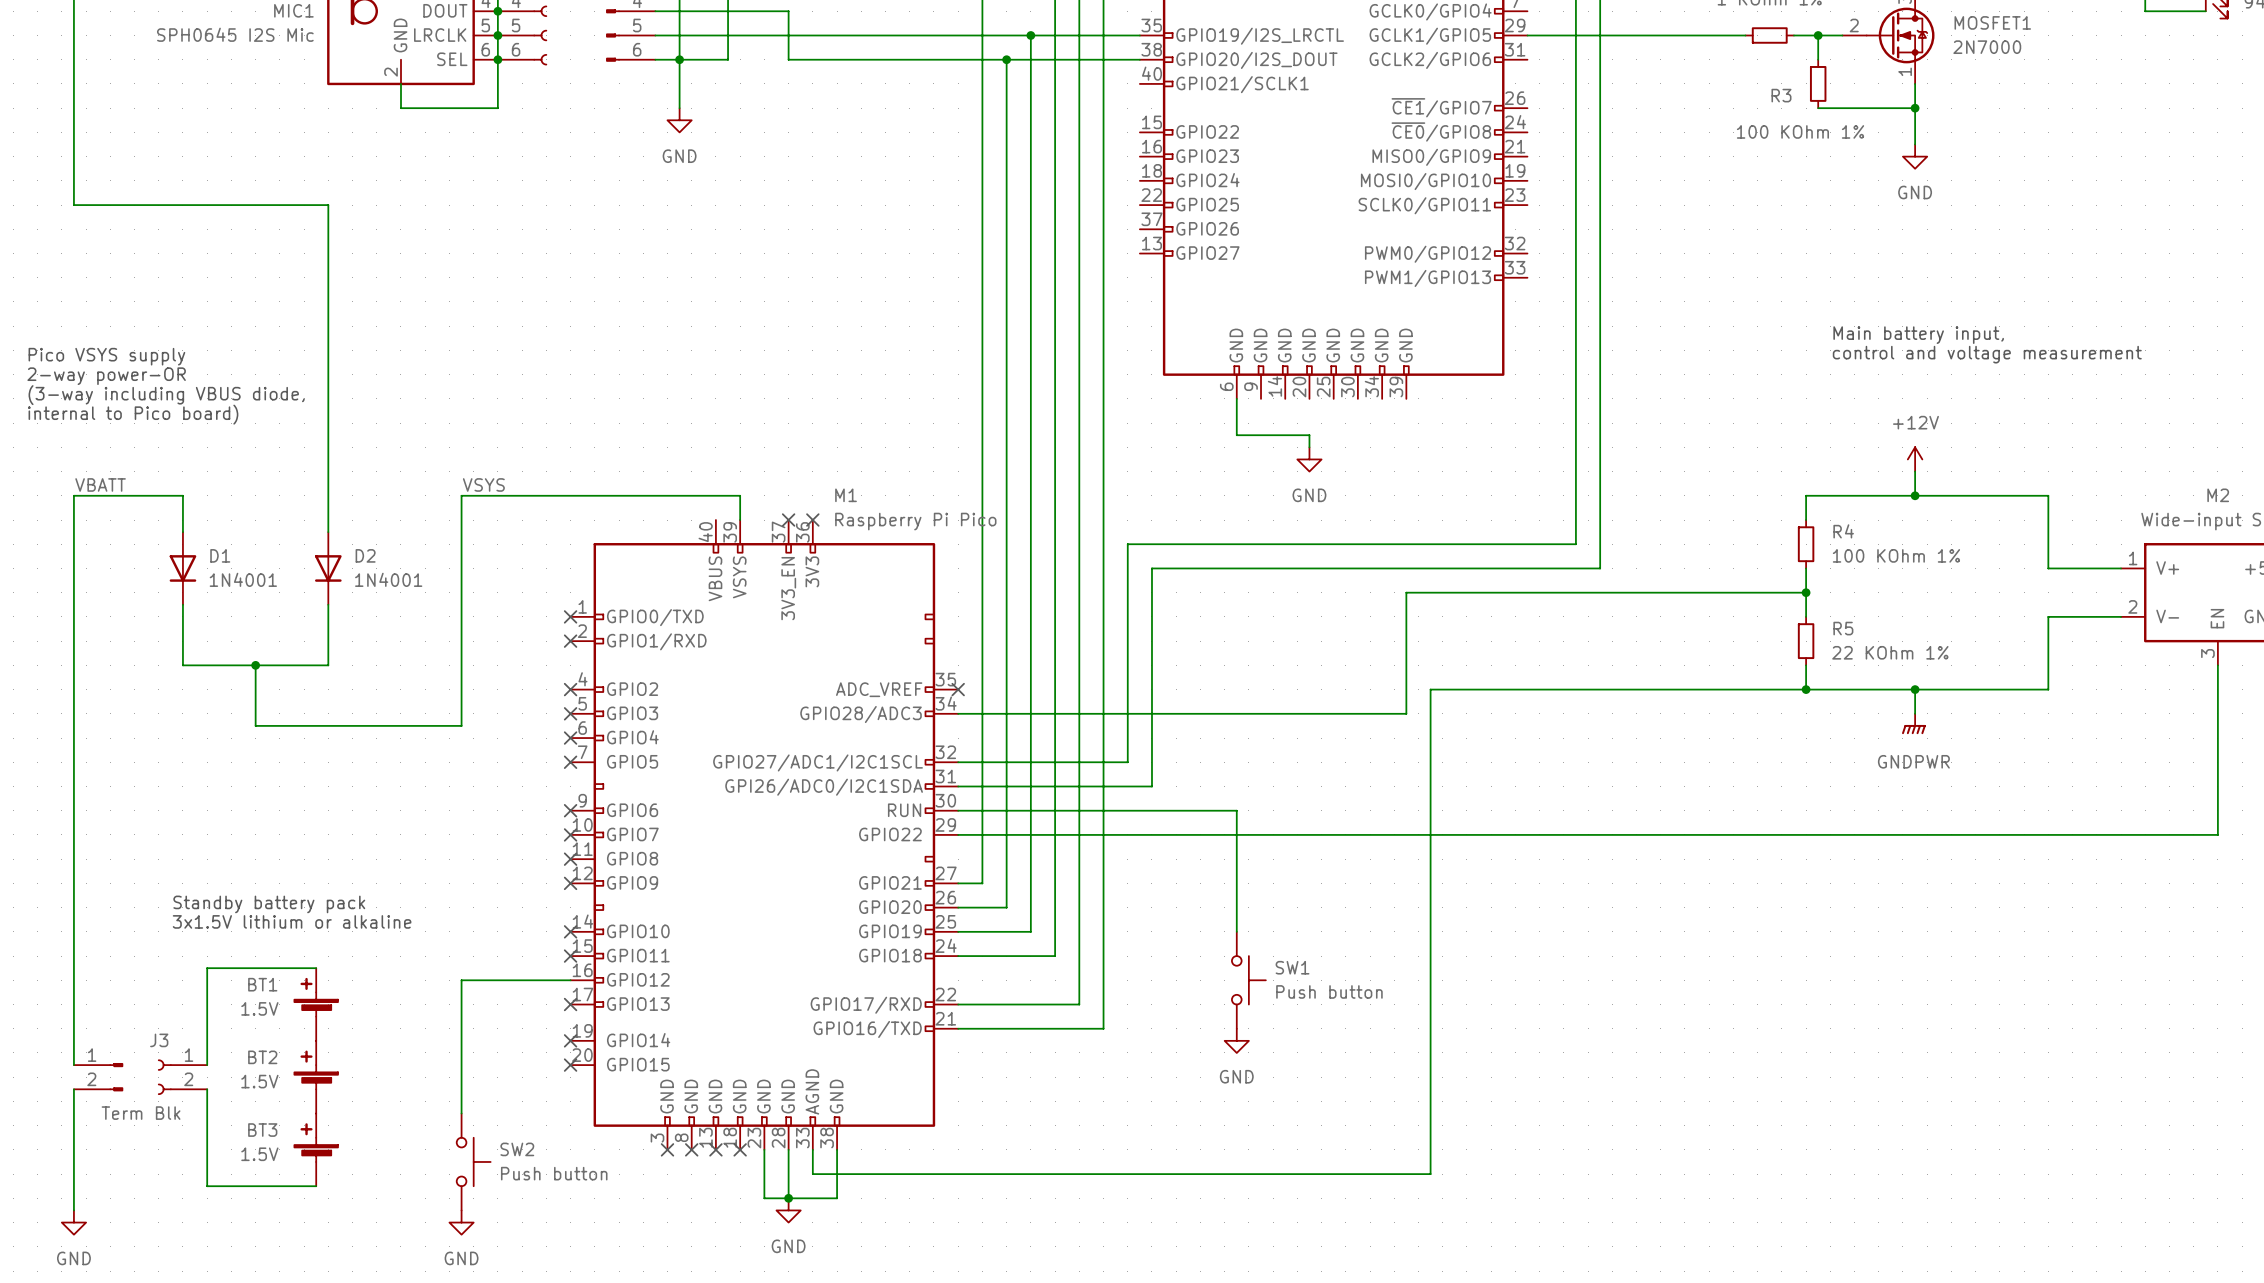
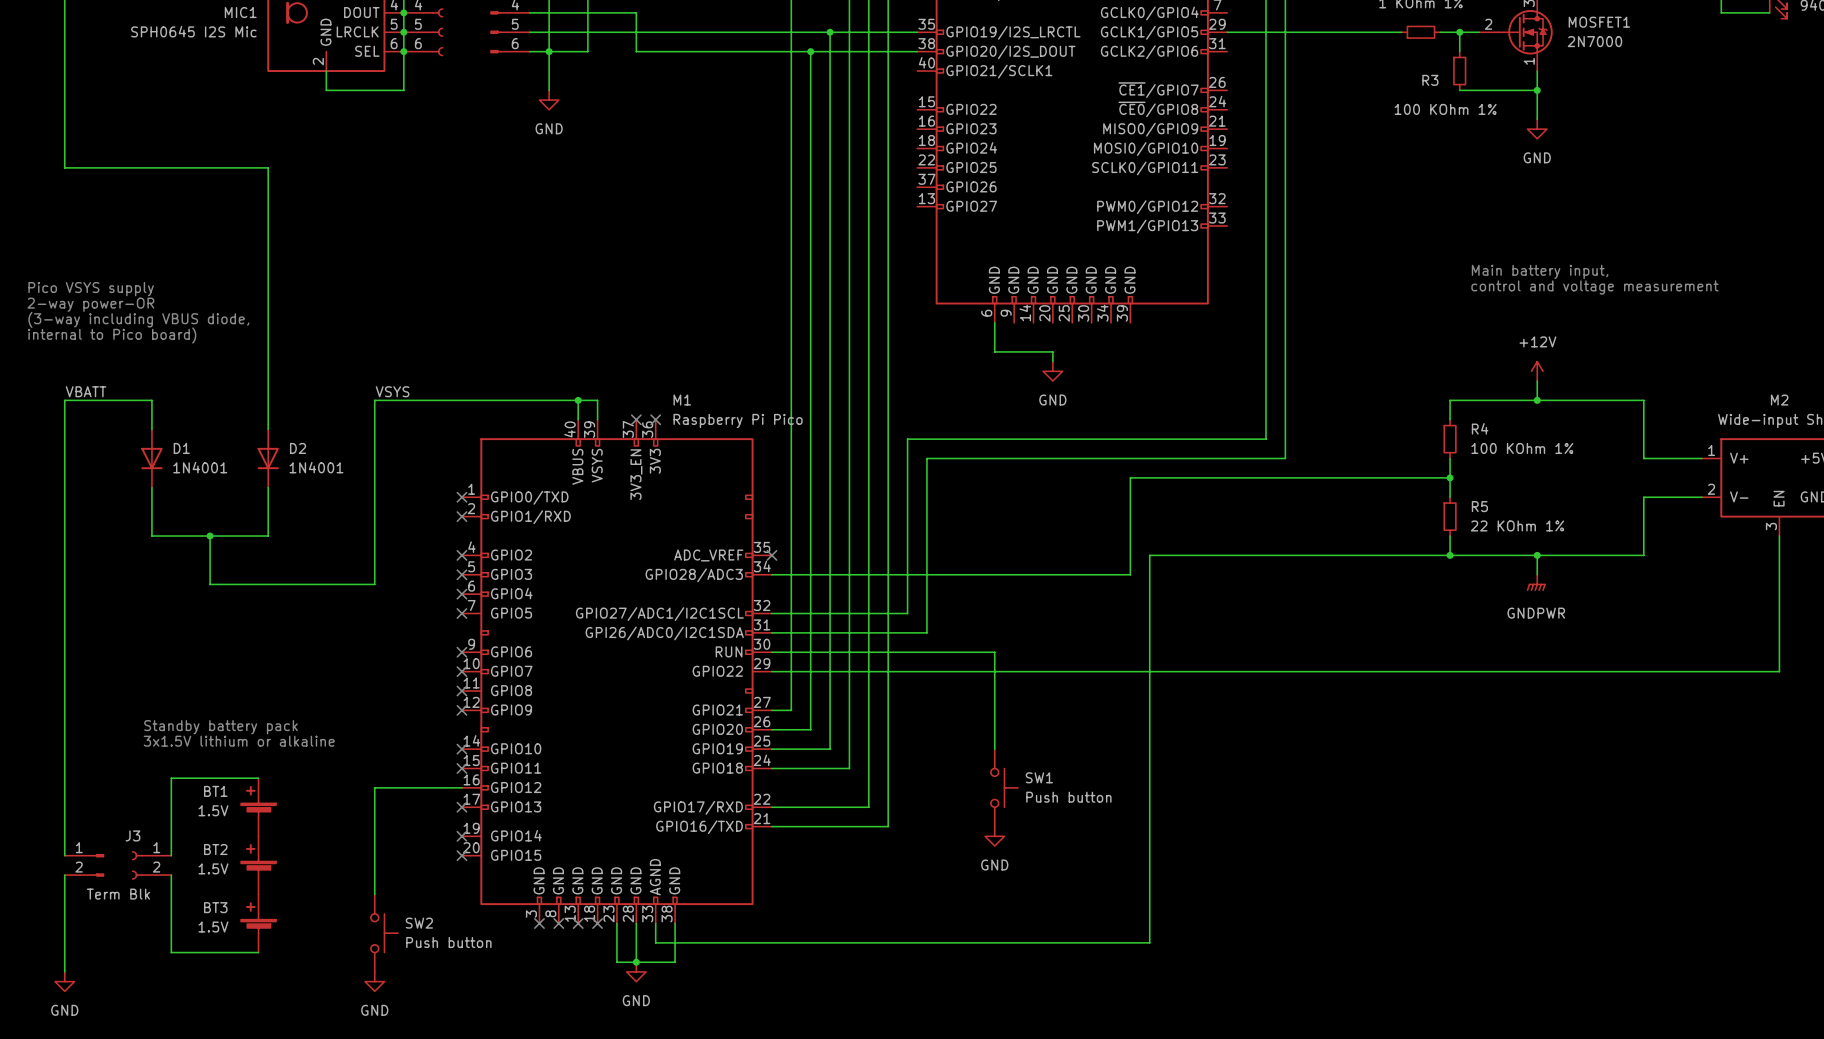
wire: none -> (578, 400) (578, 419)
junction: none -> (578, 400)

